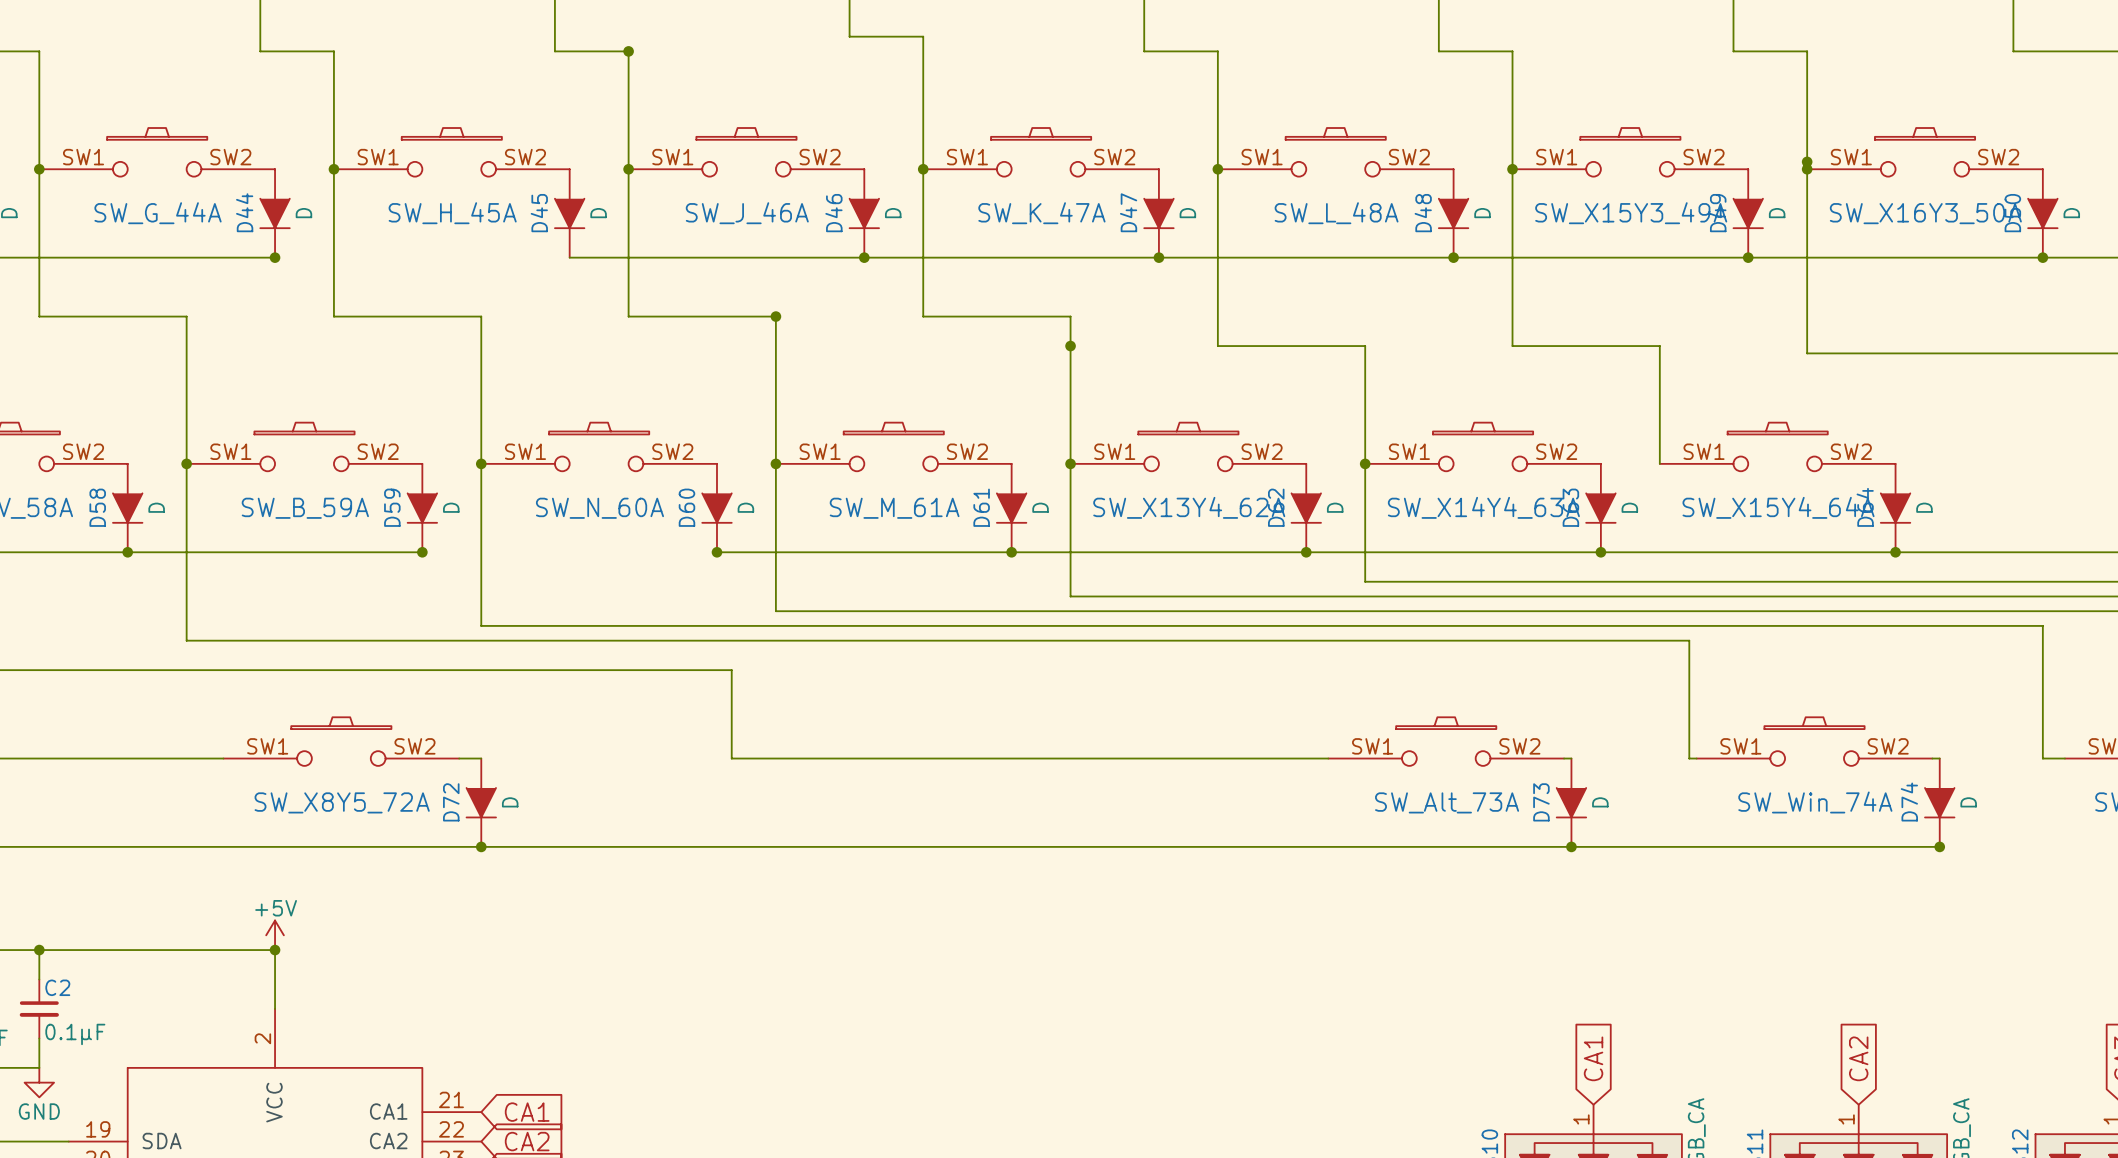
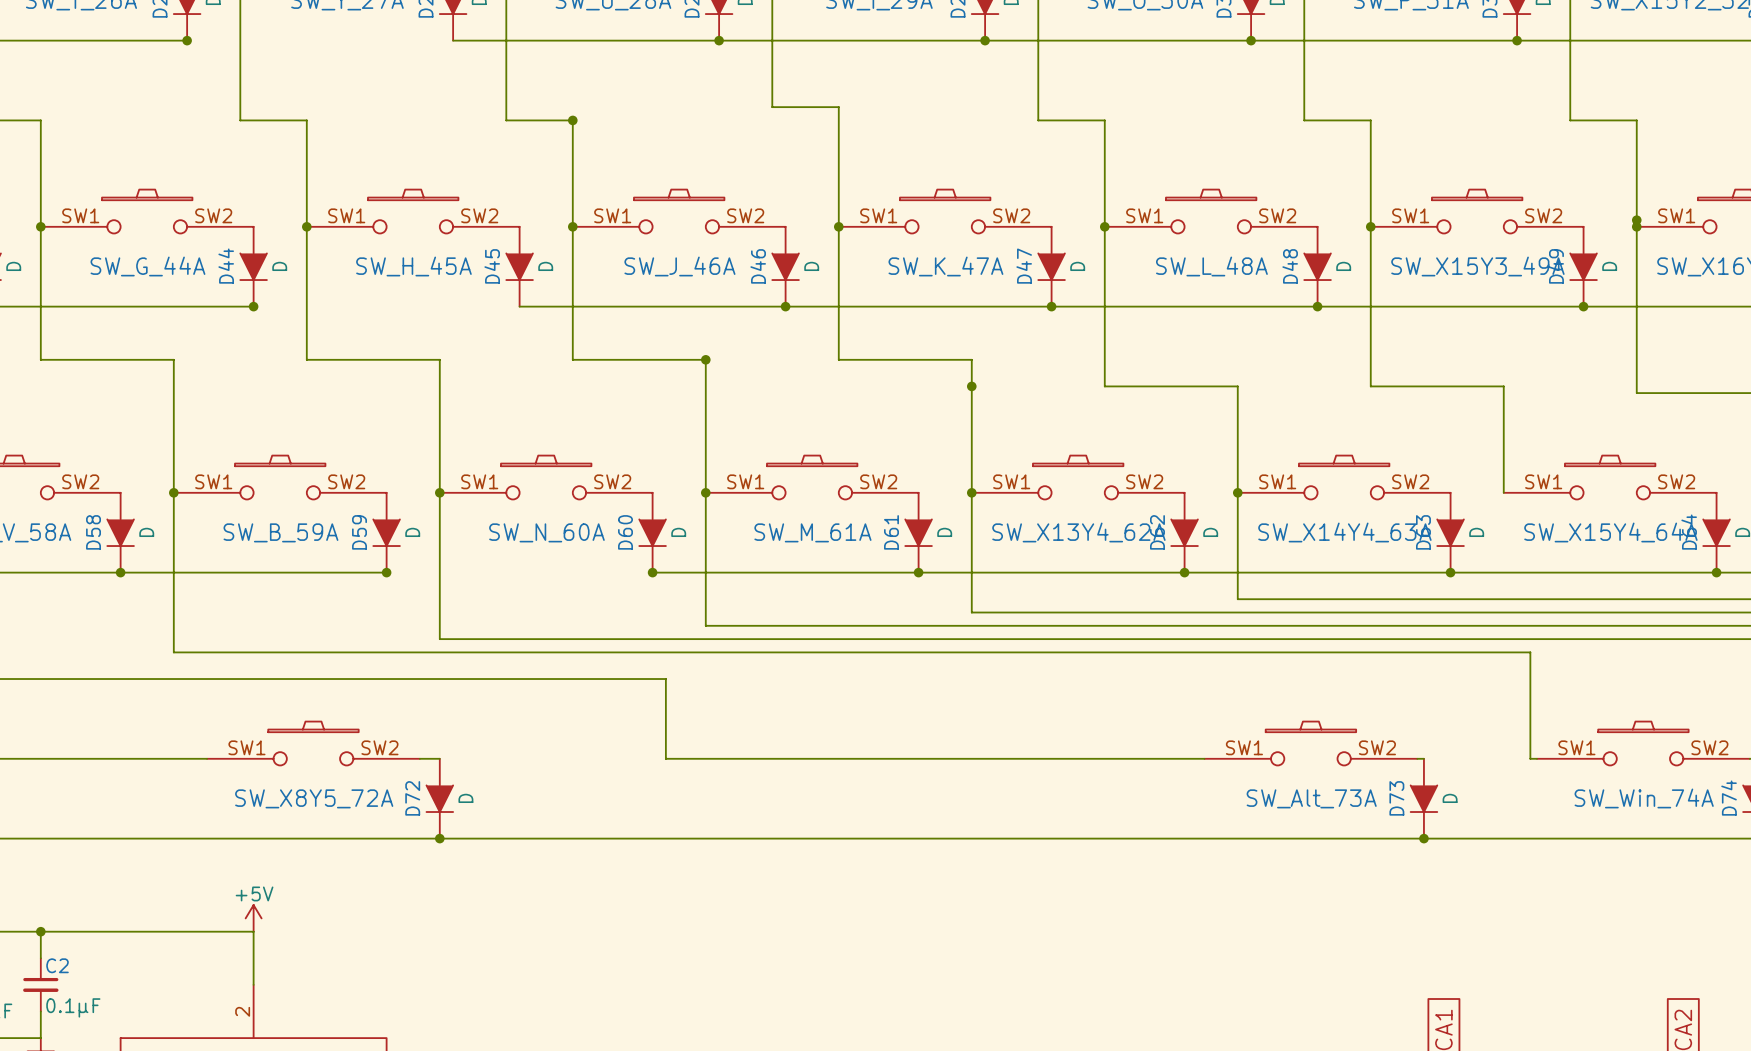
junction: (275, 950) -> none

